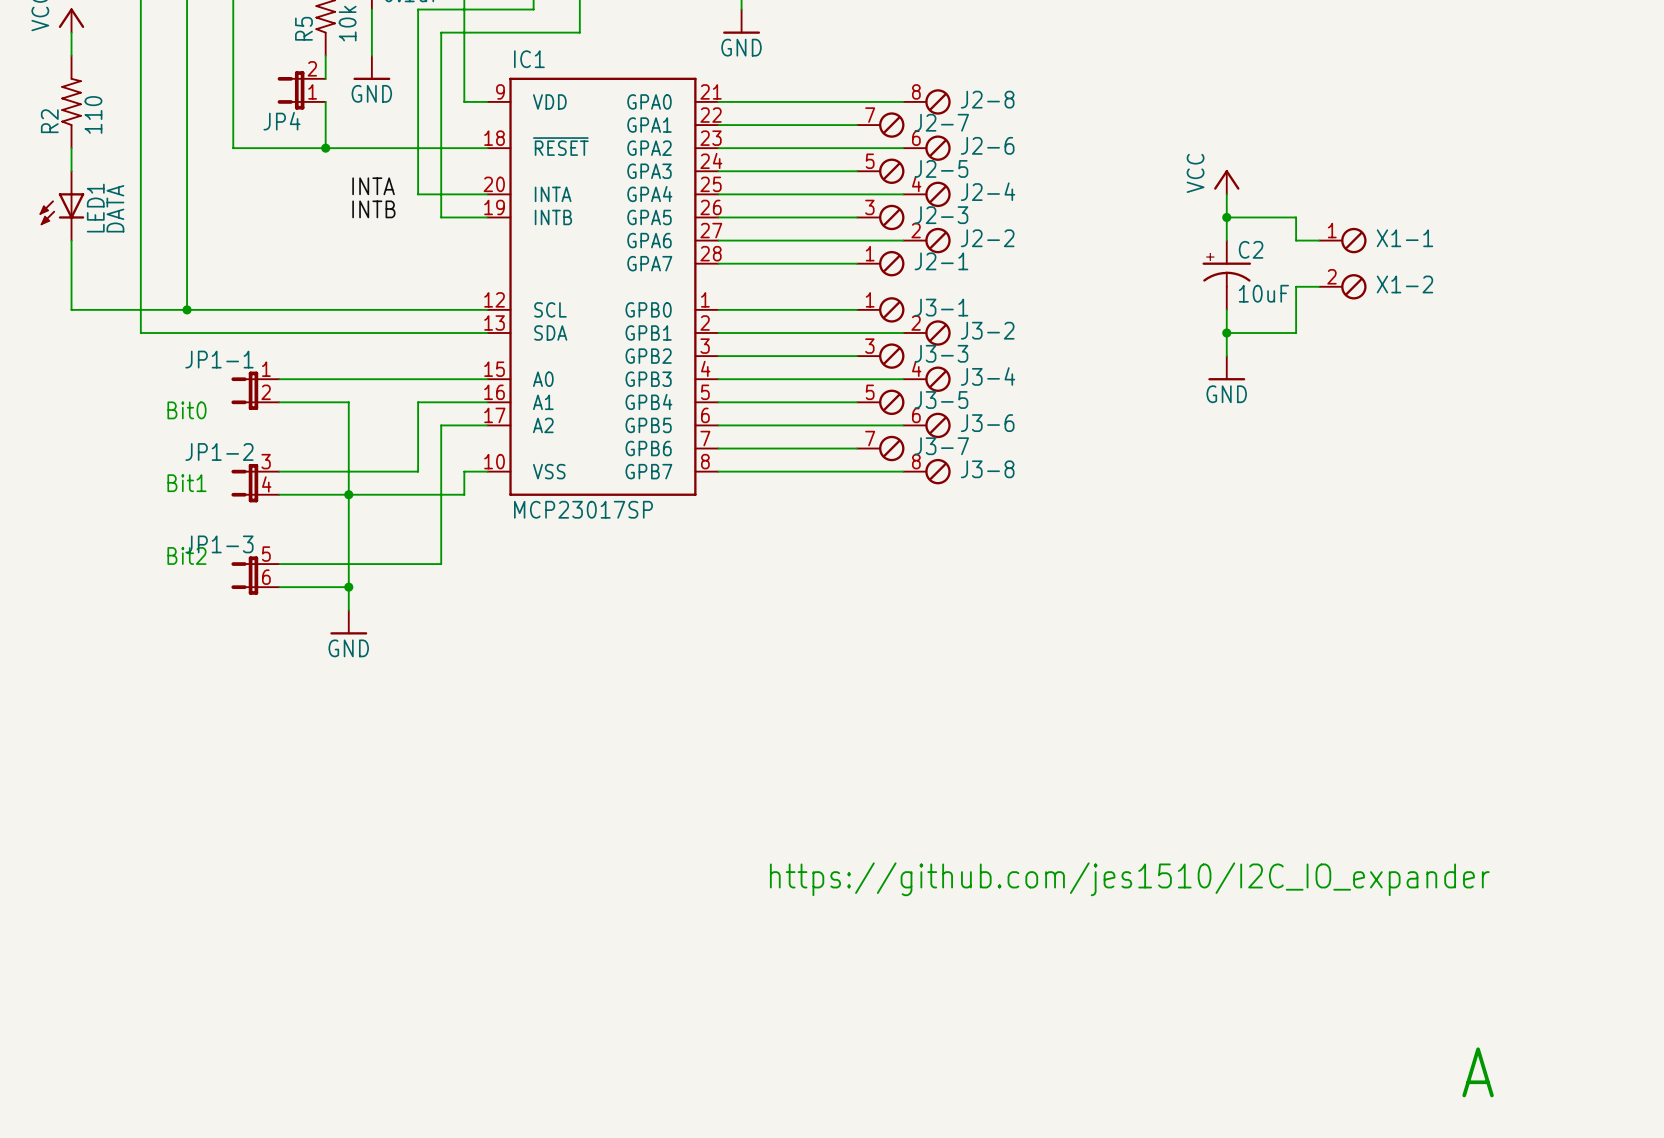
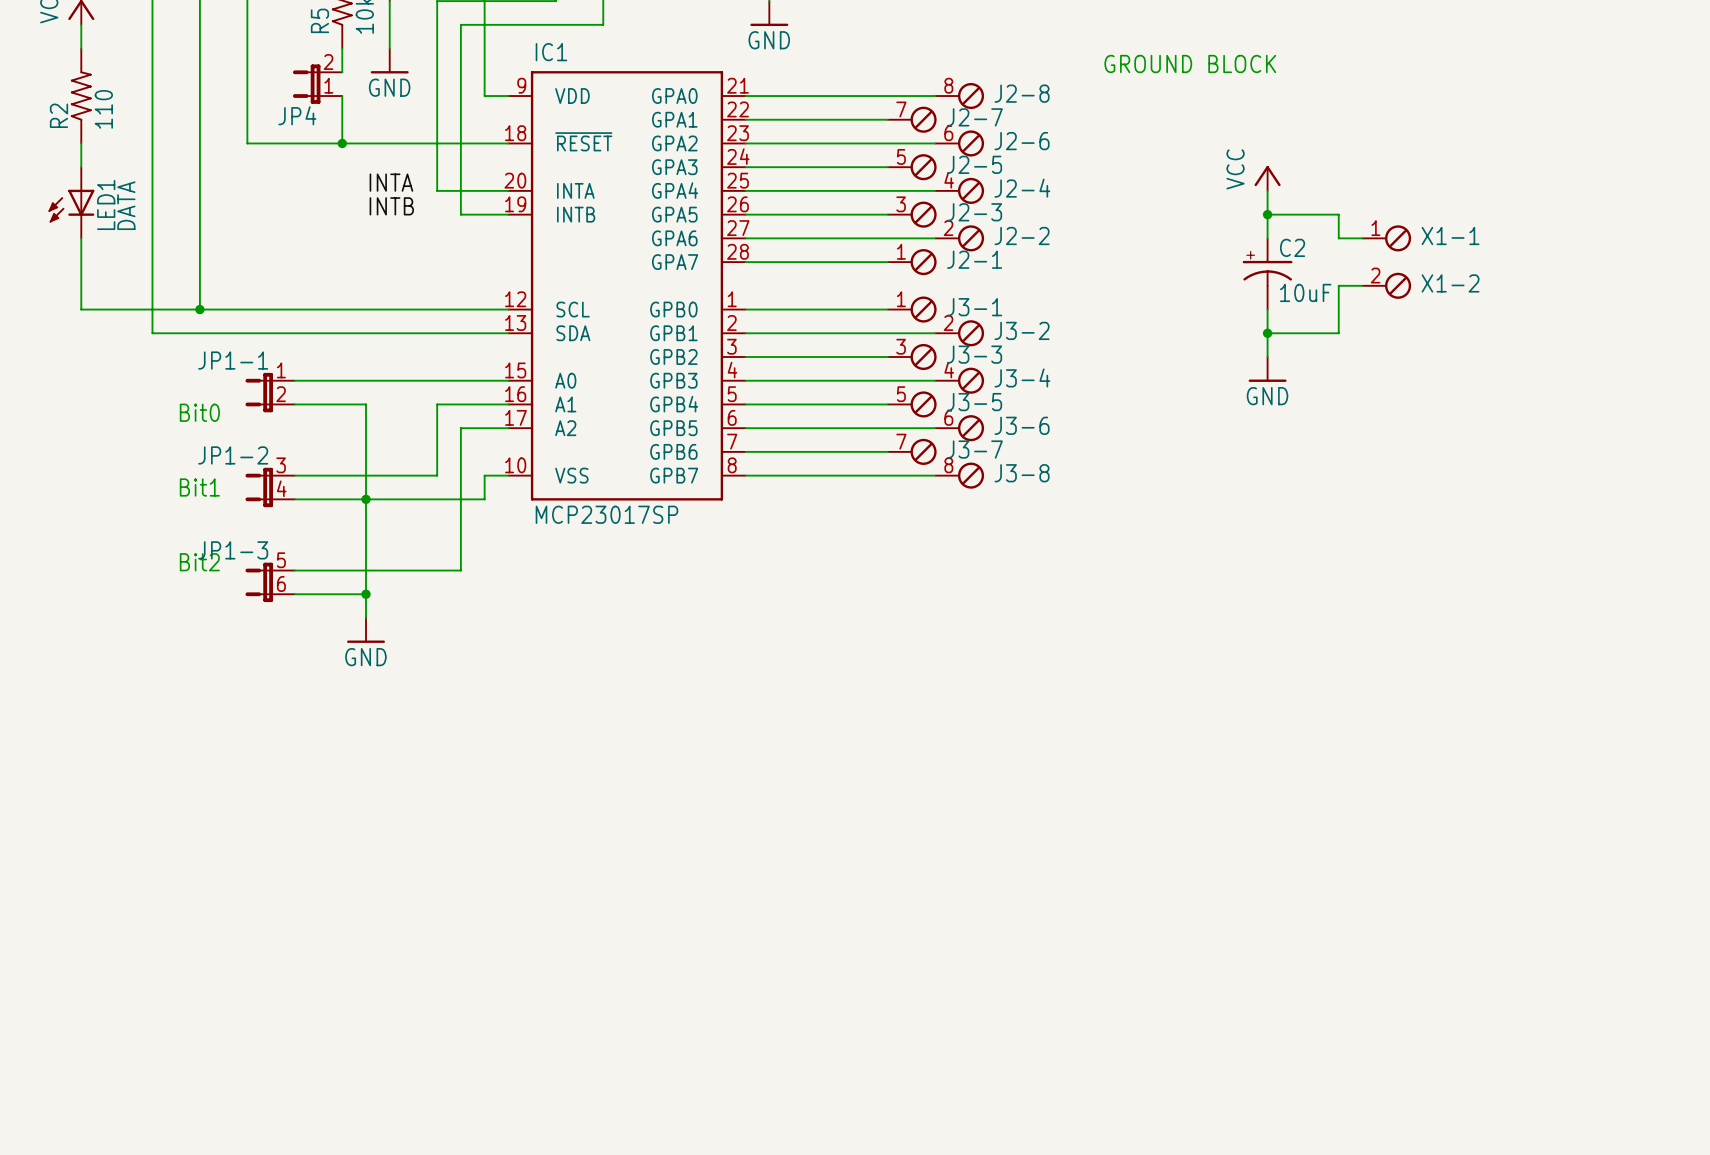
text: none -> GROUND BLOCK (1190, 63)
text: https://github.com/jes1510/I2C_IO_expander (1129, 879) -> none
text: A (1478, 1072) -> none

